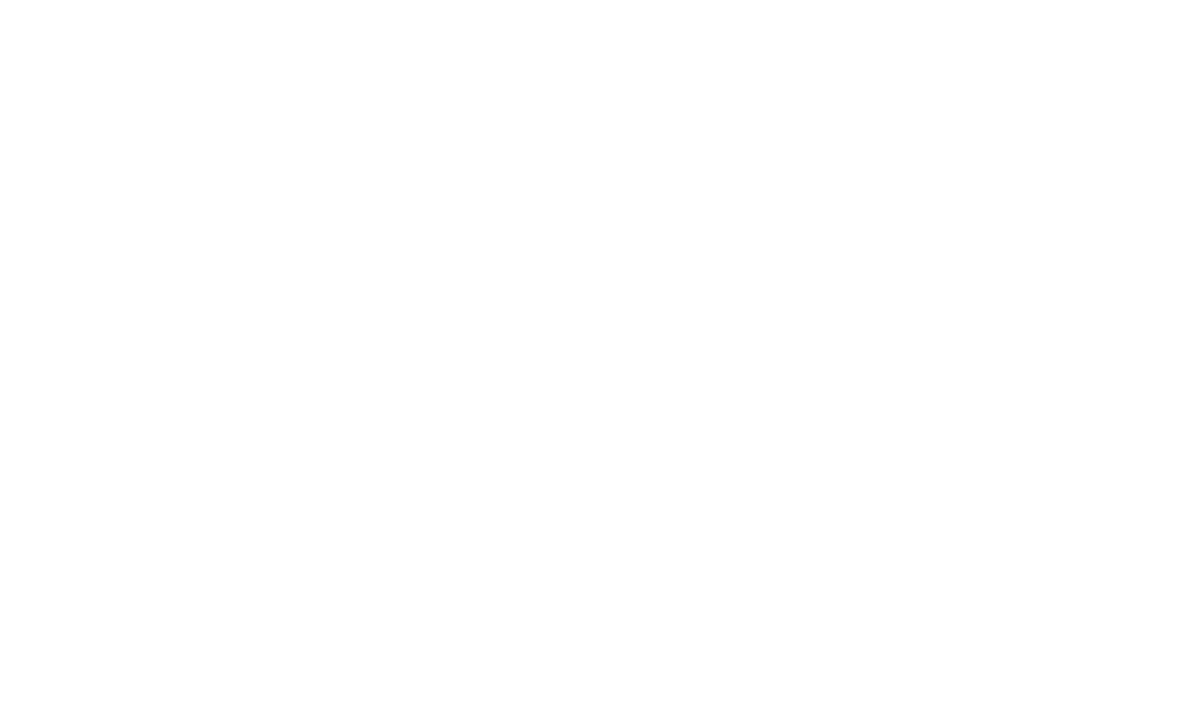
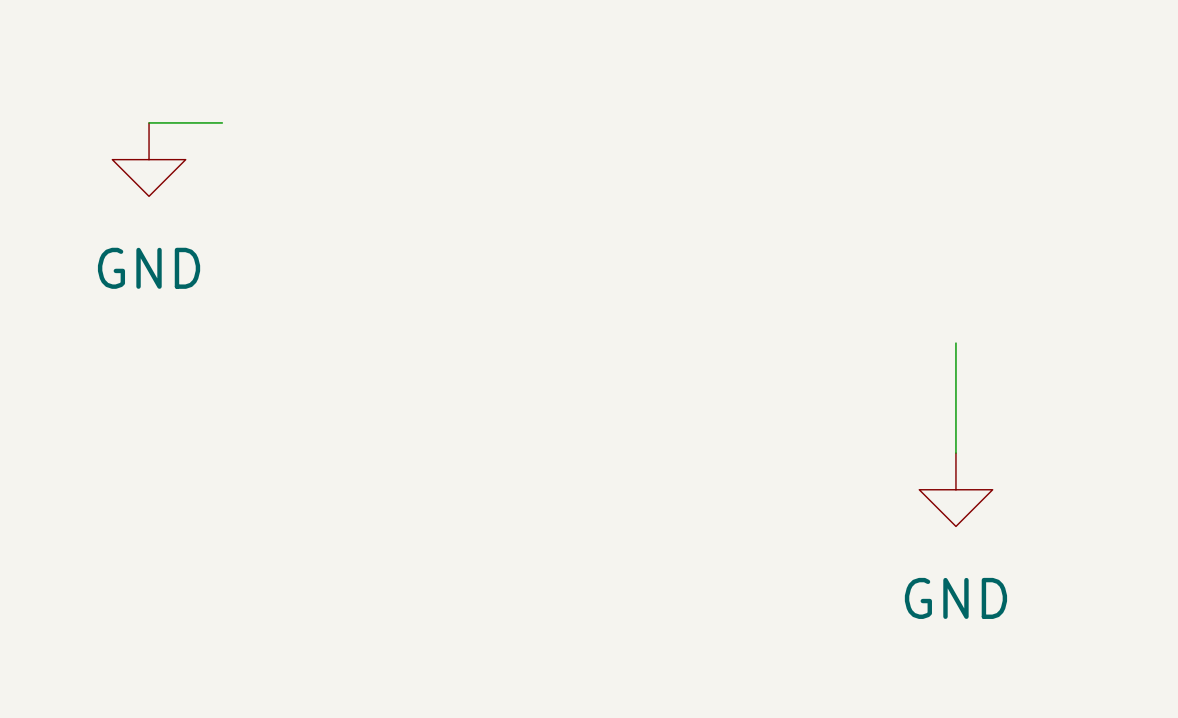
wire: none -> (149, 122) (222, 122)
power symbol: none -> GND (149, 159)
wire: none -> (955, 343) (955, 453)
power symbol: none -> GND (955, 489)

